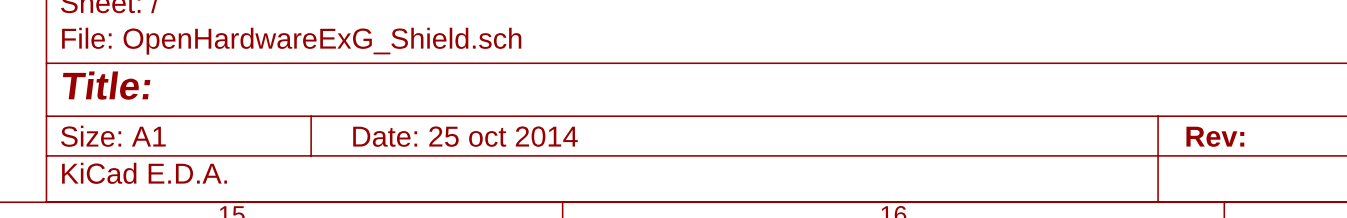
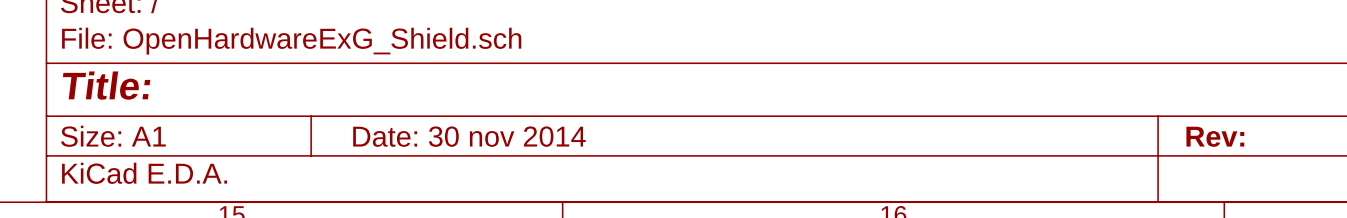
title block: Date: 25 oct 2014 (465, 136) -> Date: 30 nov 2014 (469, 136)

